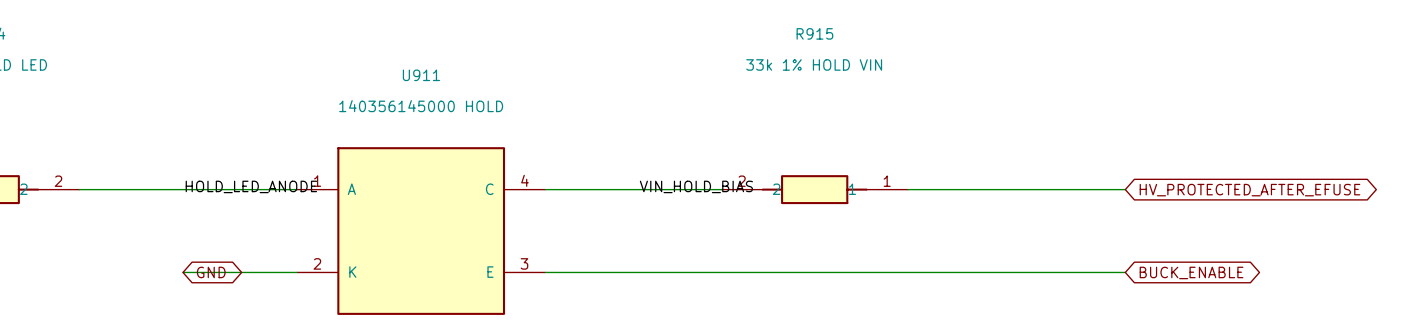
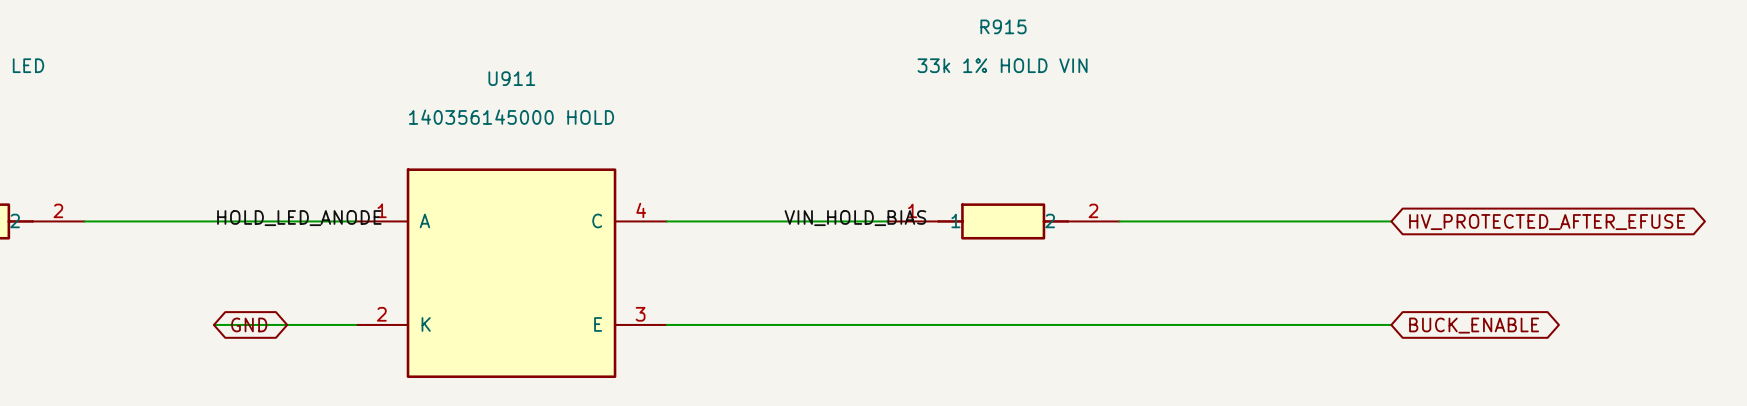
R915 rotation: 0° (814, 189) -> 180° (1003, 221)

